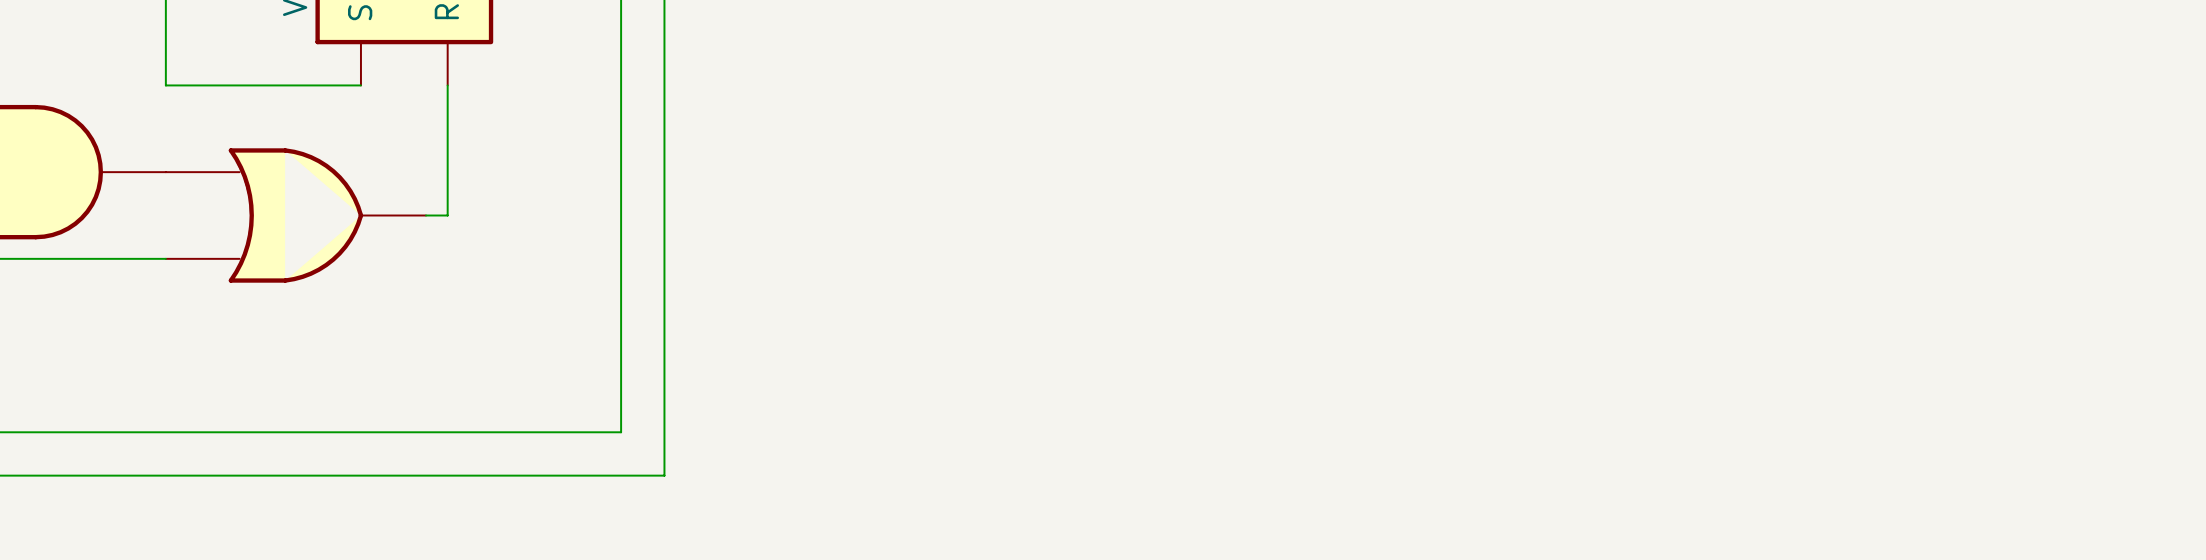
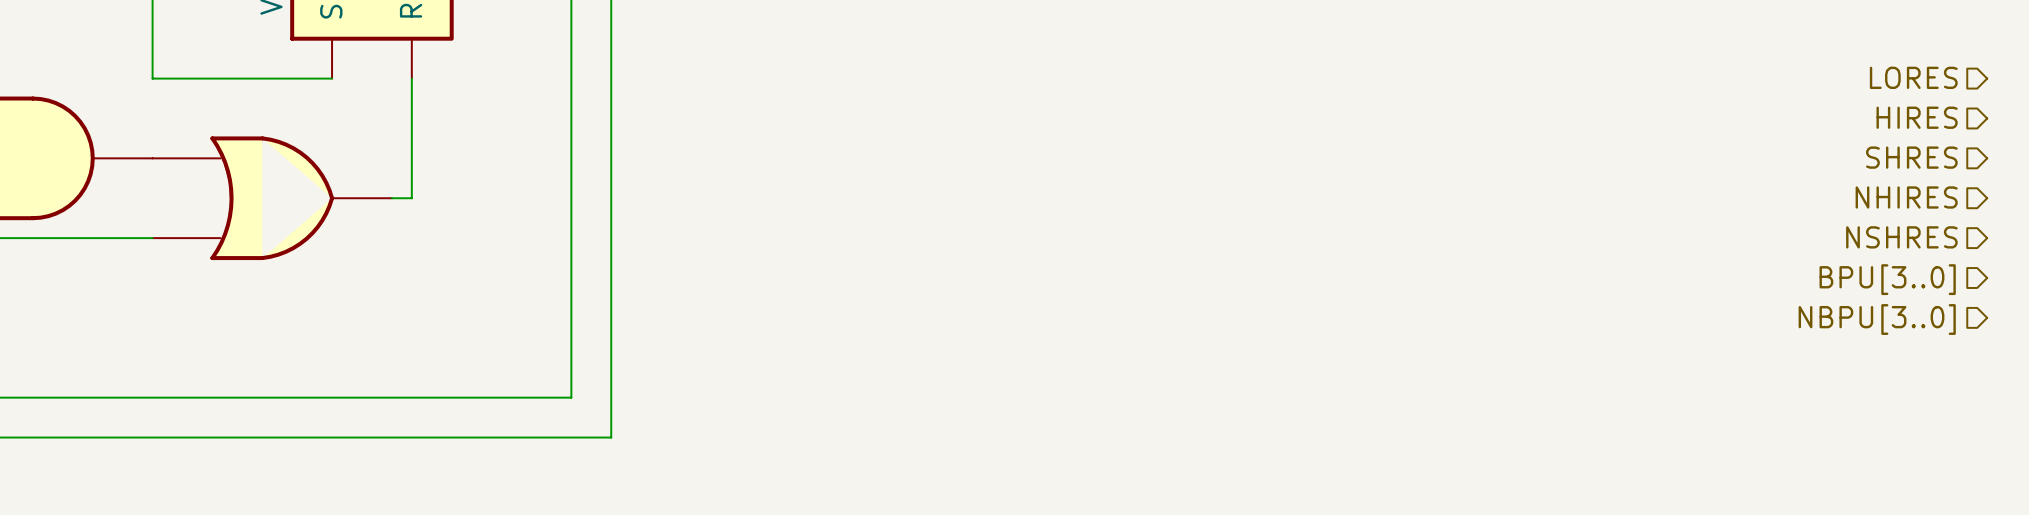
hierarchical label: none -> LORES (1913, 77)
hierarchical label: none -> HIRES (1917, 117)
hierarchical label: none -> SHRES (1911, 157)
hierarchical label: none -> NHIRES (1906, 197)
hierarchical label: none -> NSHRES (1901, 237)
hierarchical label: none -> BPU[3..0] (1887, 279)
hierarchical label: none -> NBPU[3..0] (1877, 319)

